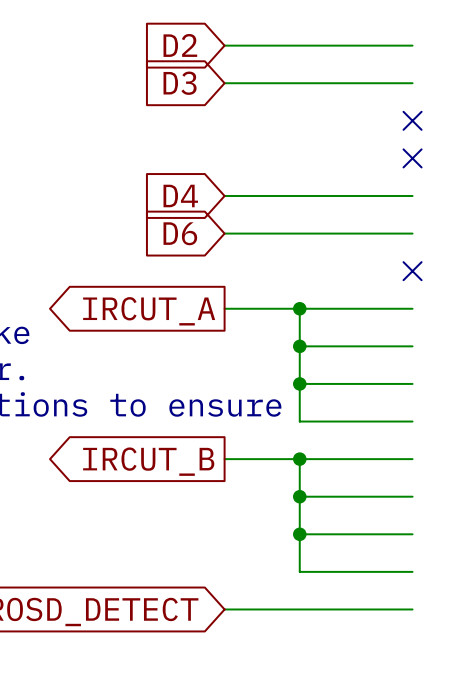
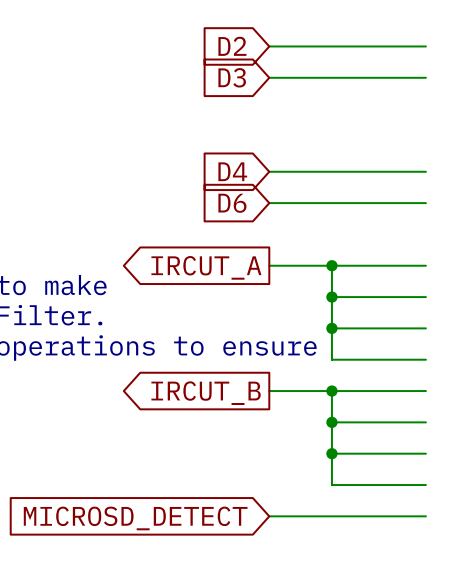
no-connect mark: (412, 120) -> none
no-connect mark: (412, 158) -> none
no-connect mark: (412, 271) -> none

